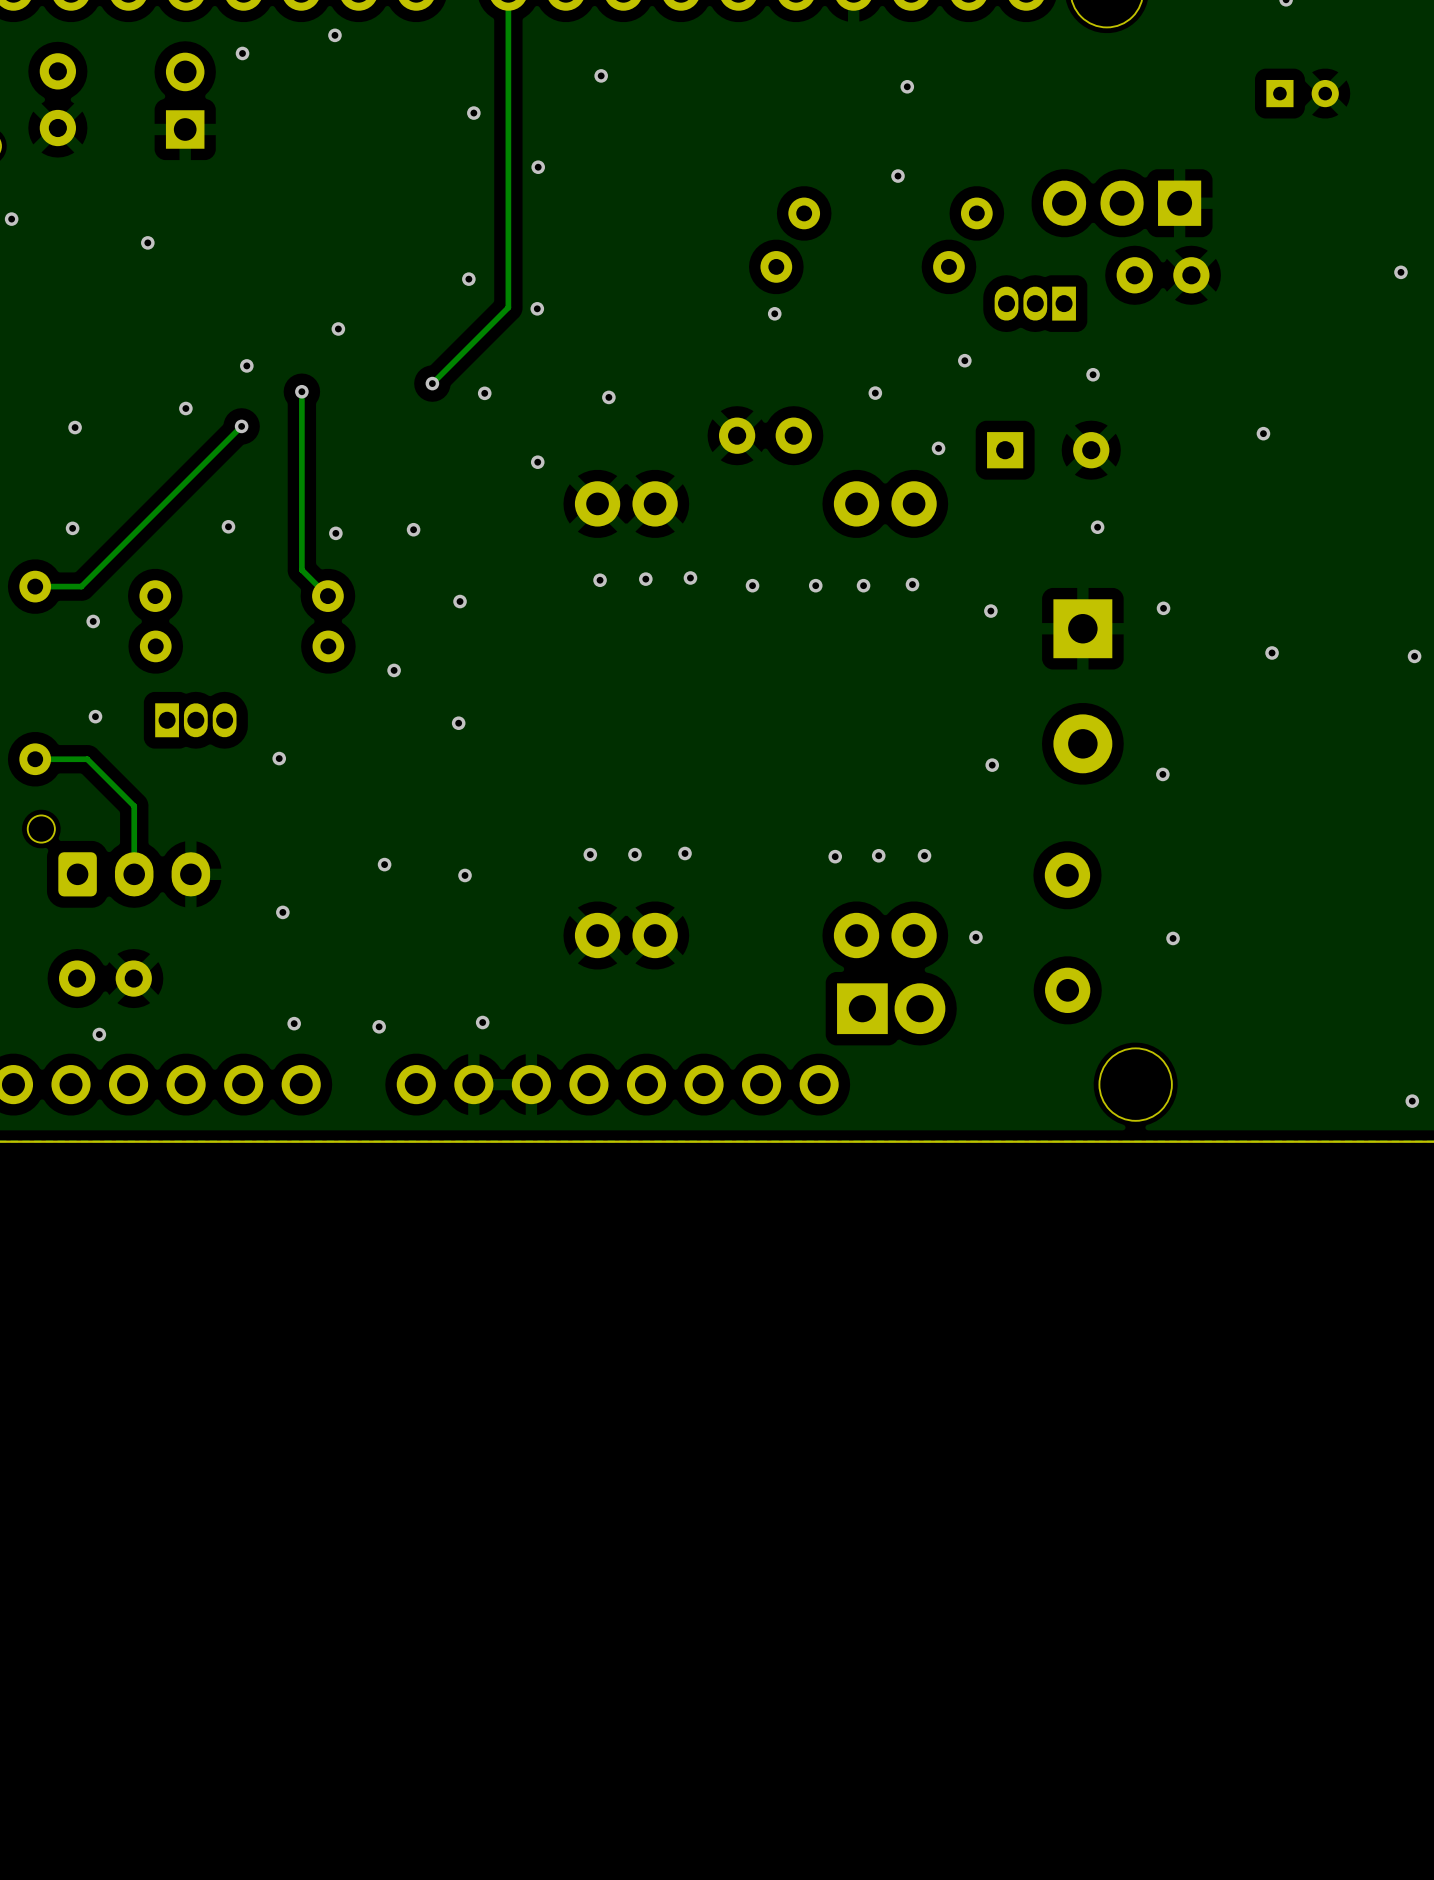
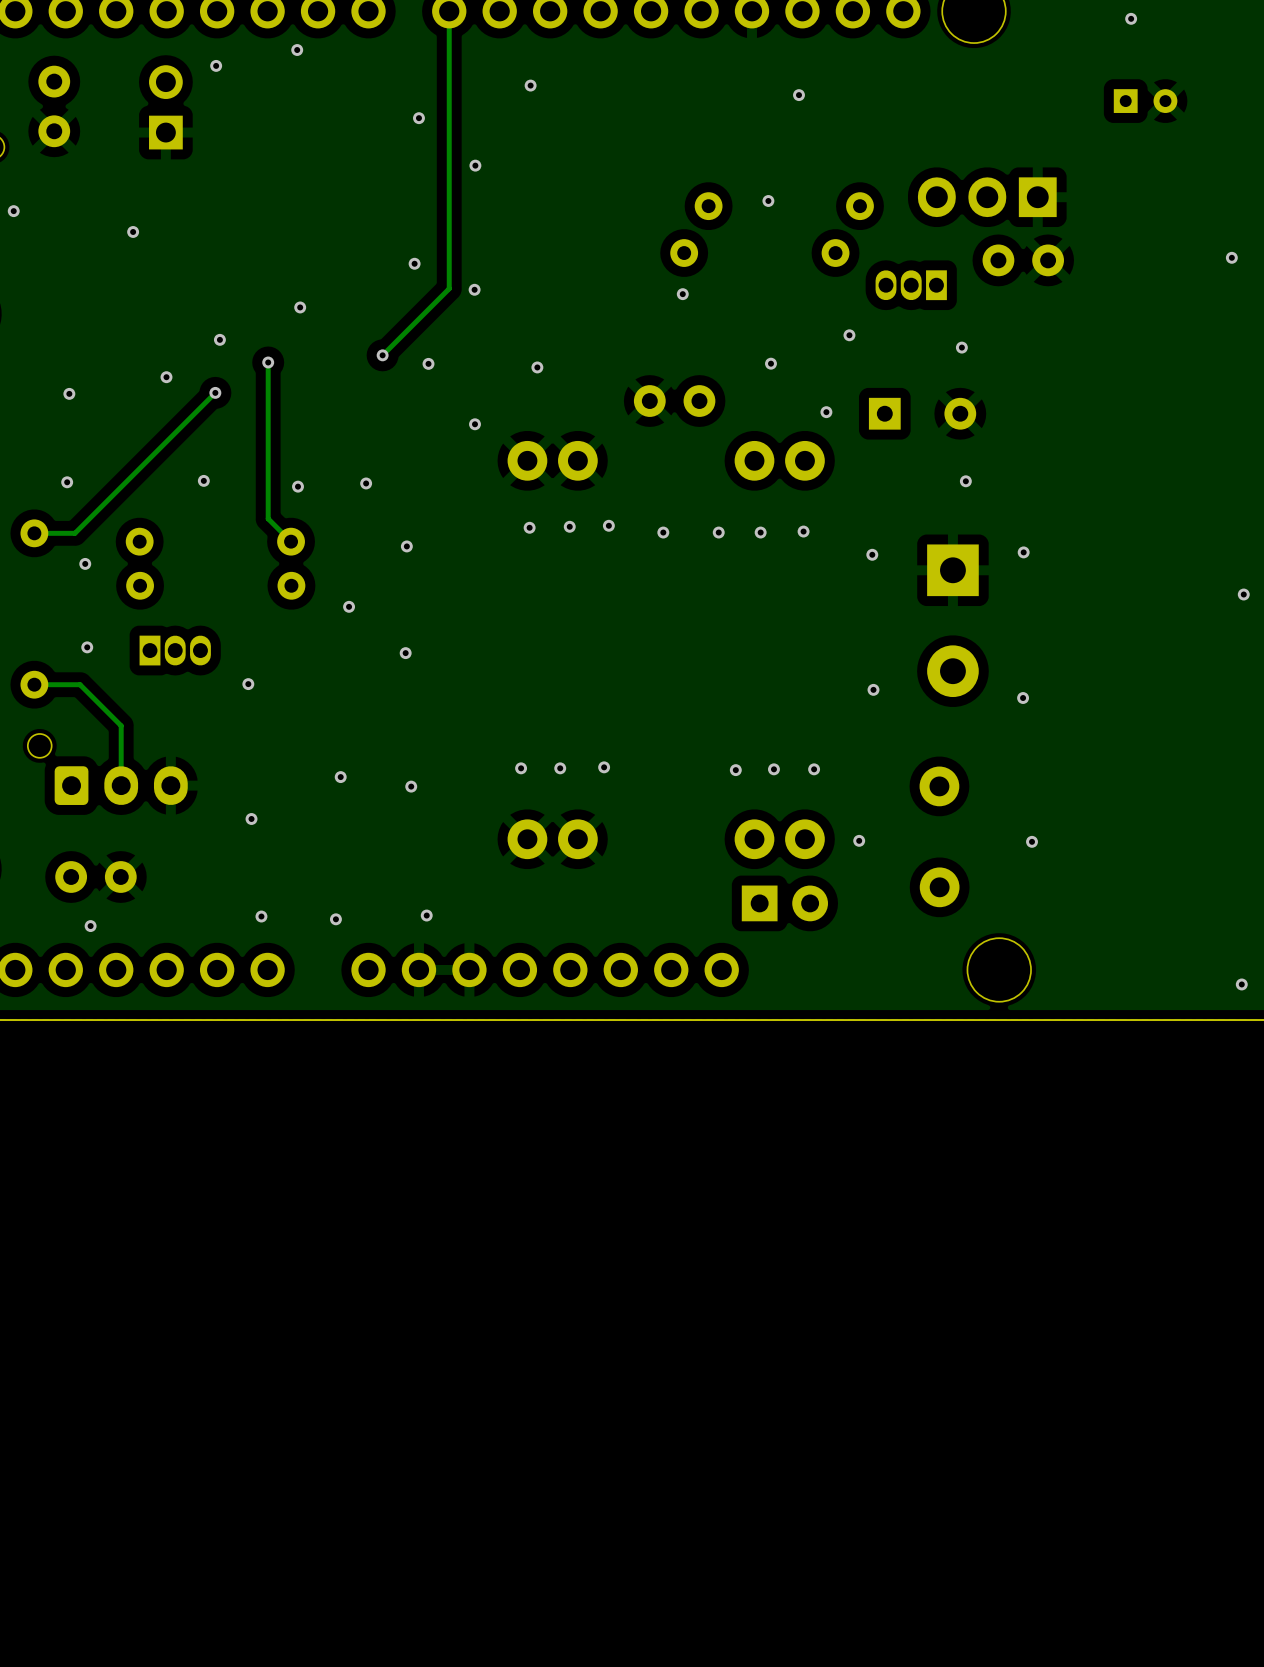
via position: (897, 176) -> (768, 200)
via: (1263, 433) -> none
via: (1272, 652) -> none
part footprint: [837, 983, 946, 1035] -> [741, 885, 829, 922]

